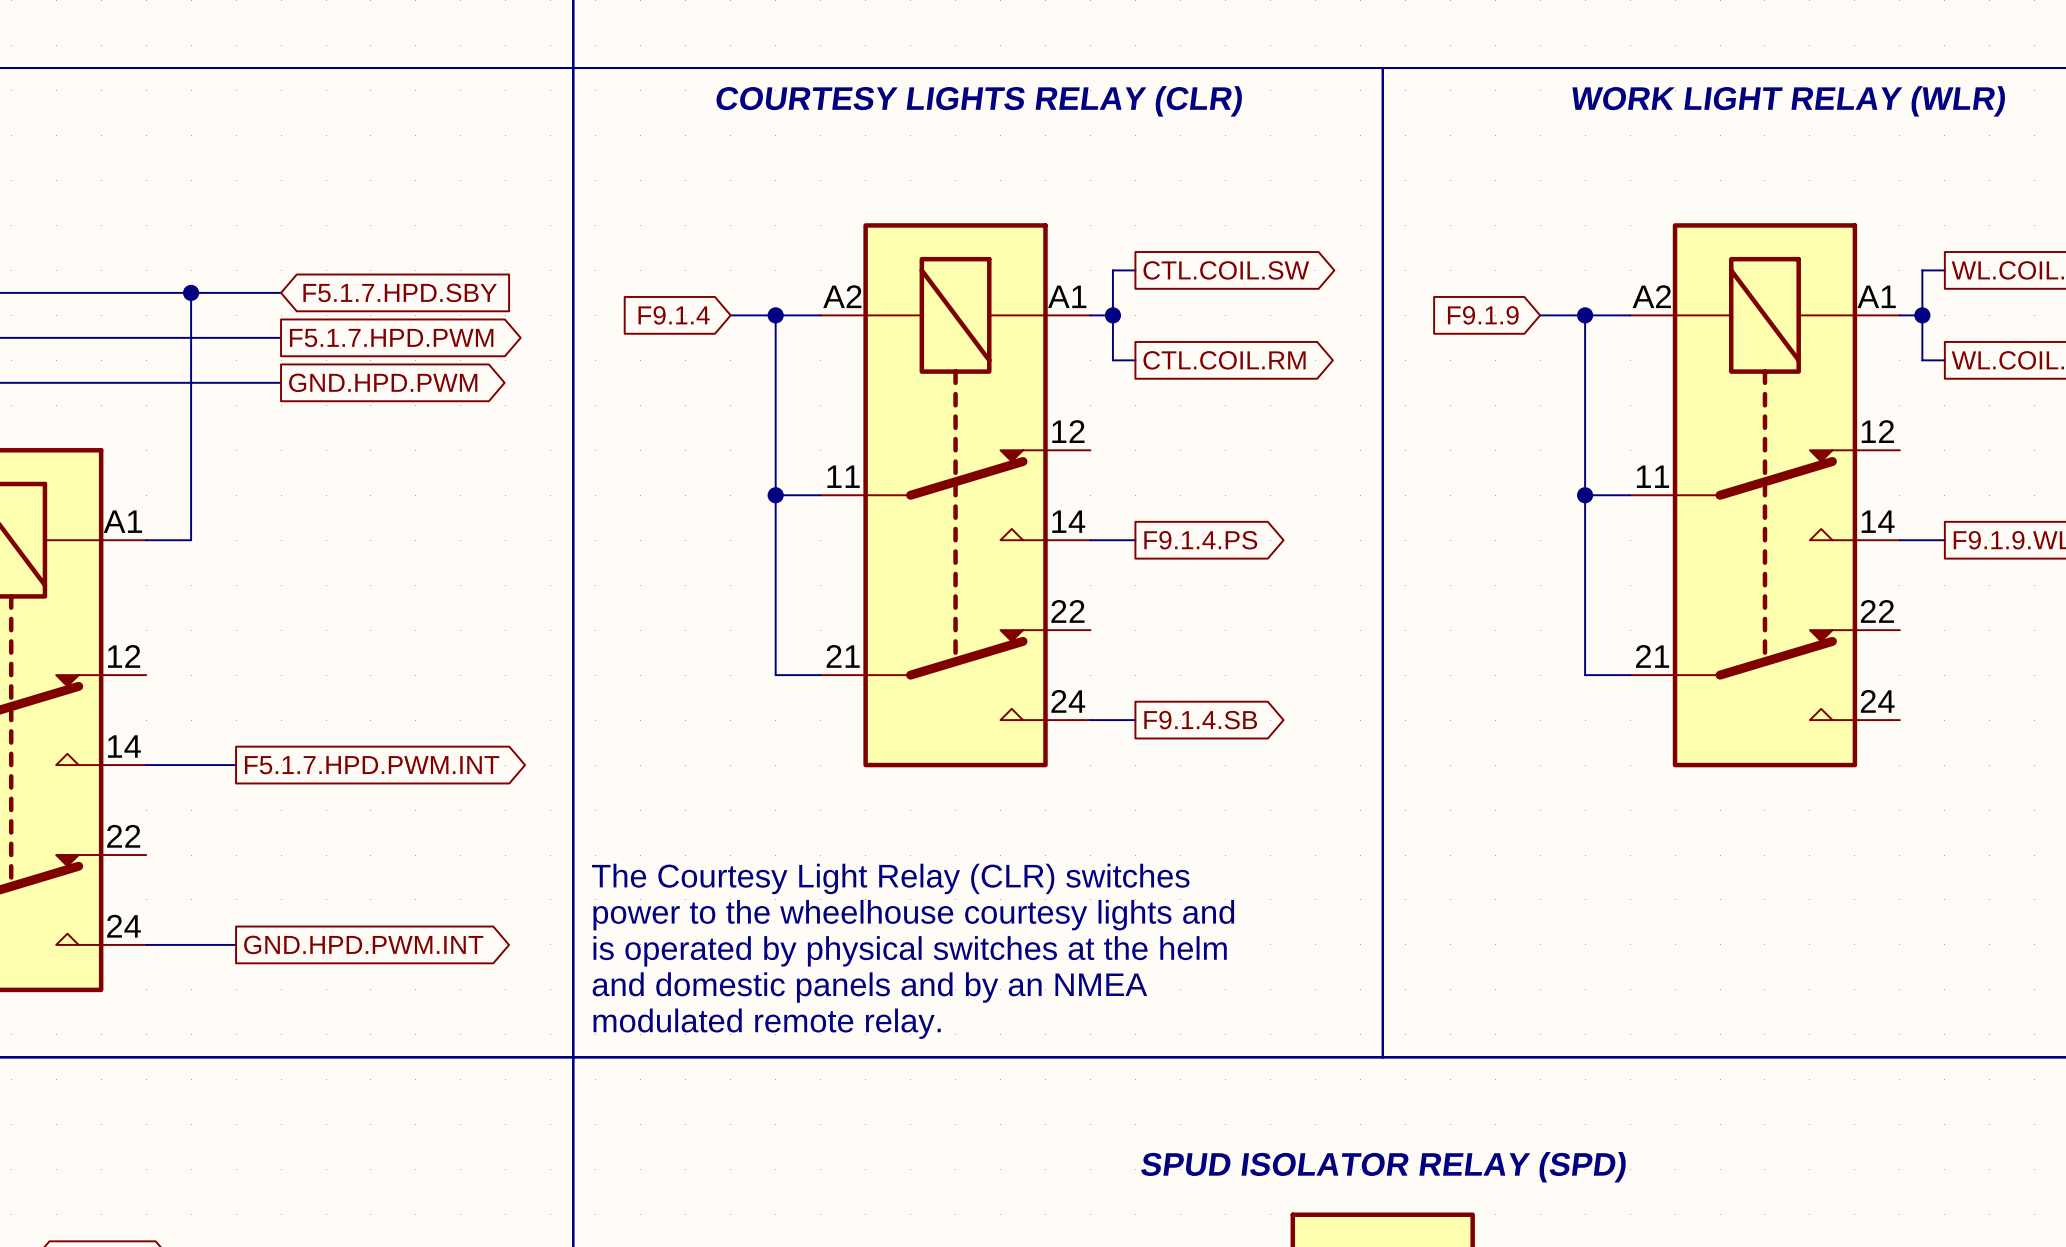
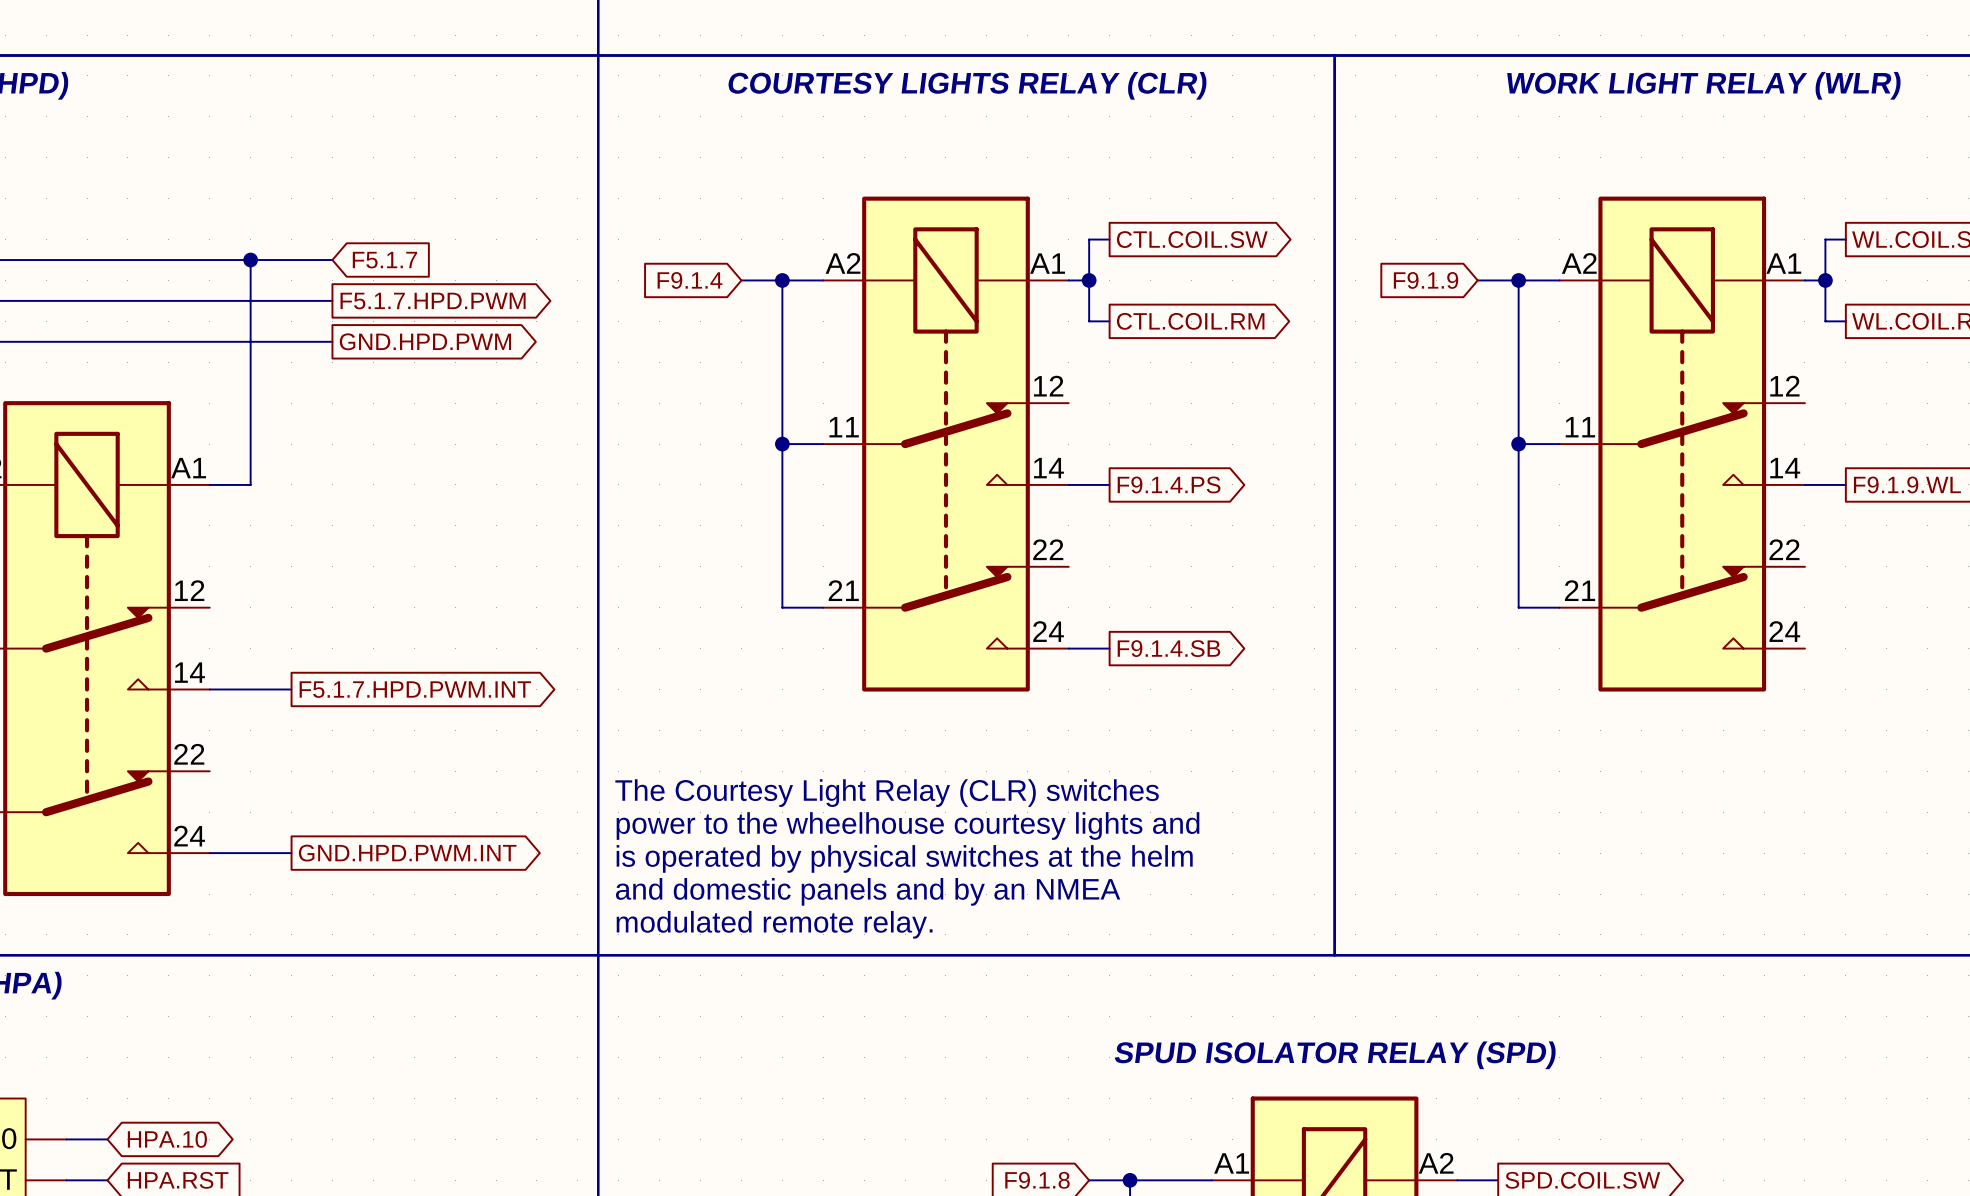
global label: F5.1.7.HPD.SBY (400, 292) -> F5.1.7 (384, 260)

